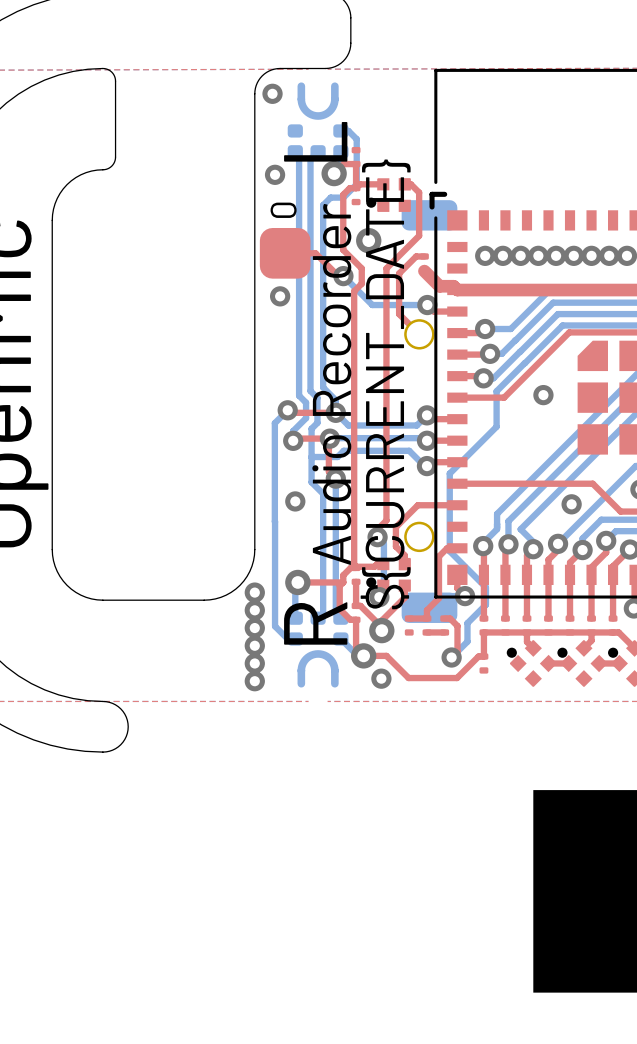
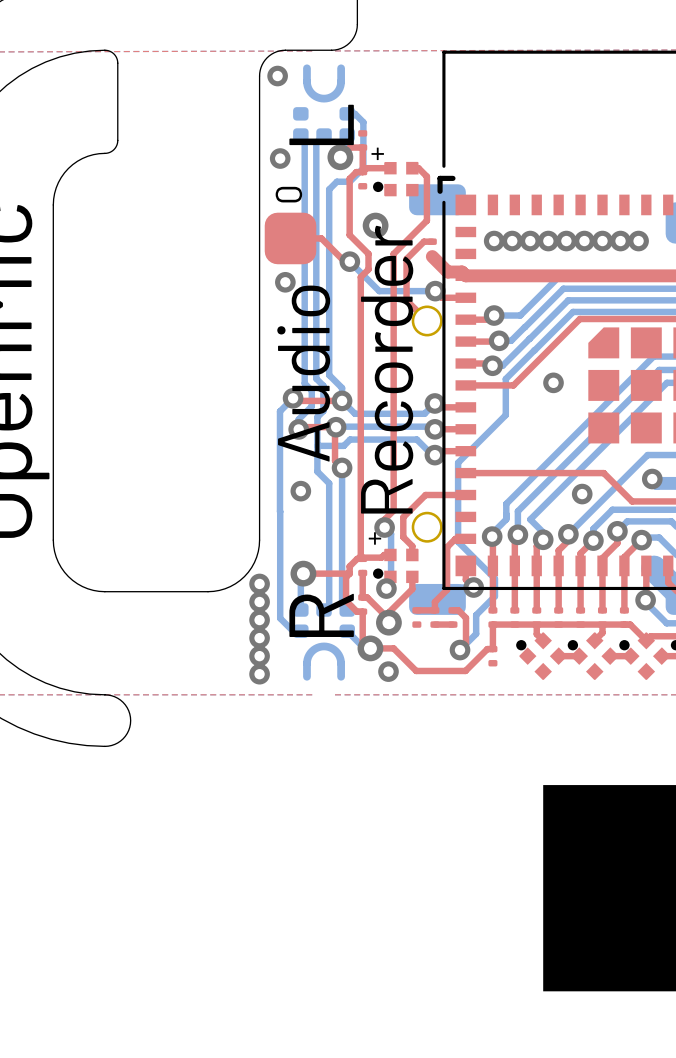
text: none -> + (377, 153)
text: Audio Recorder (331, 384) -> none
text: ${CURRENT_DATE} (385, 384) -> Recorder (387, 369)
text: none -> Audio (303, 373)
text: none -> + (374, 538)

